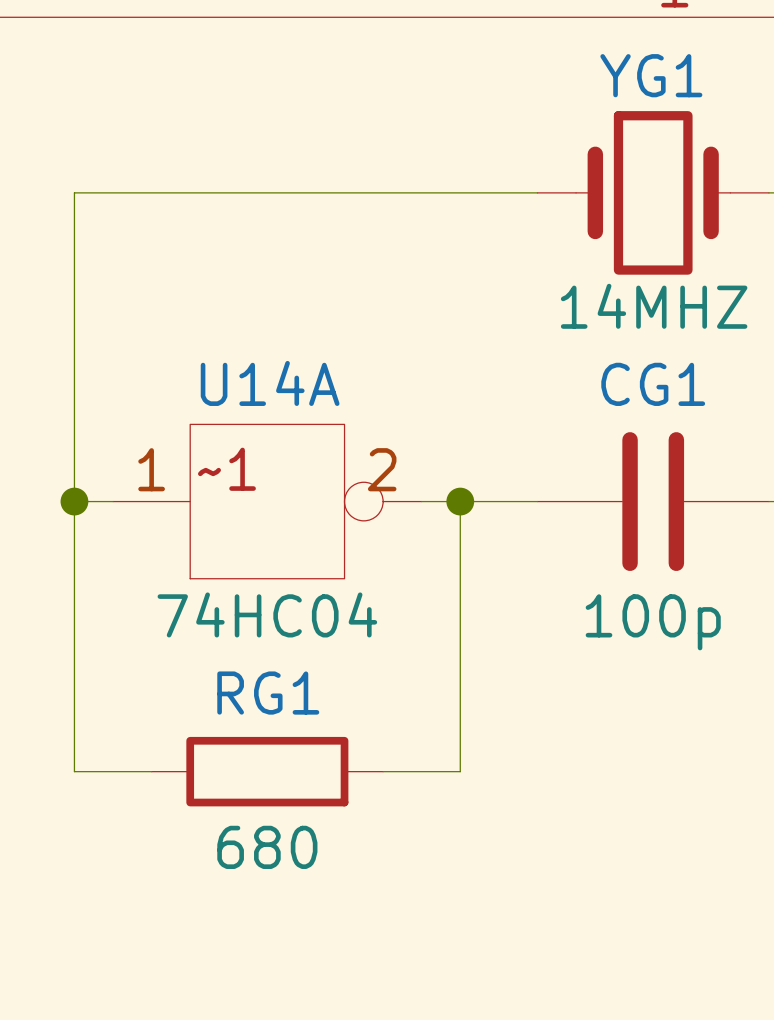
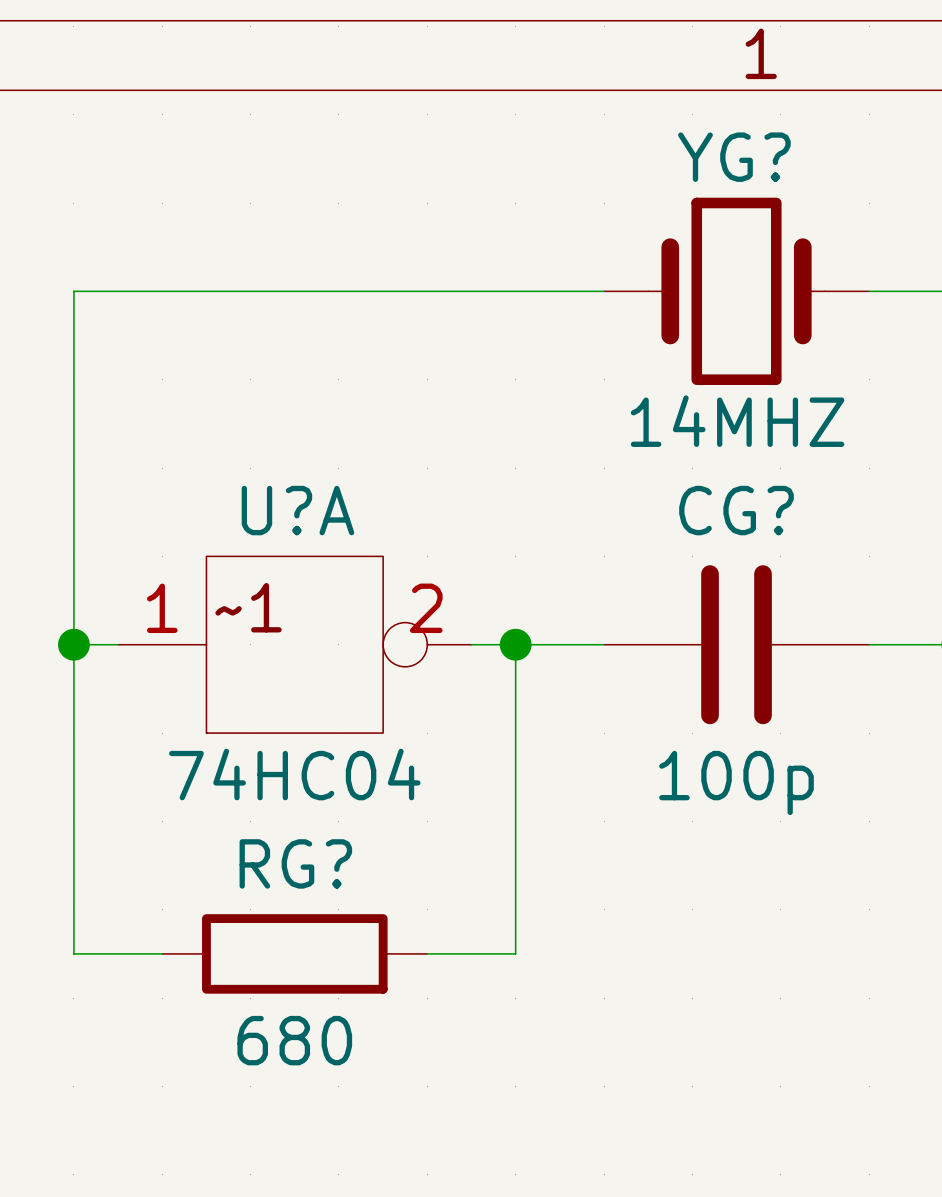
YG1 name: YG1 (651, 75) -> YG? (734, 157)
U14A name: U14A (270, 383) -> U?A (297, 510)
CG1 name: CG1 (653, 384) -> CG? (736, 510)
RG1 name: RG1 (268, 693) -> RG? (295, 863)

